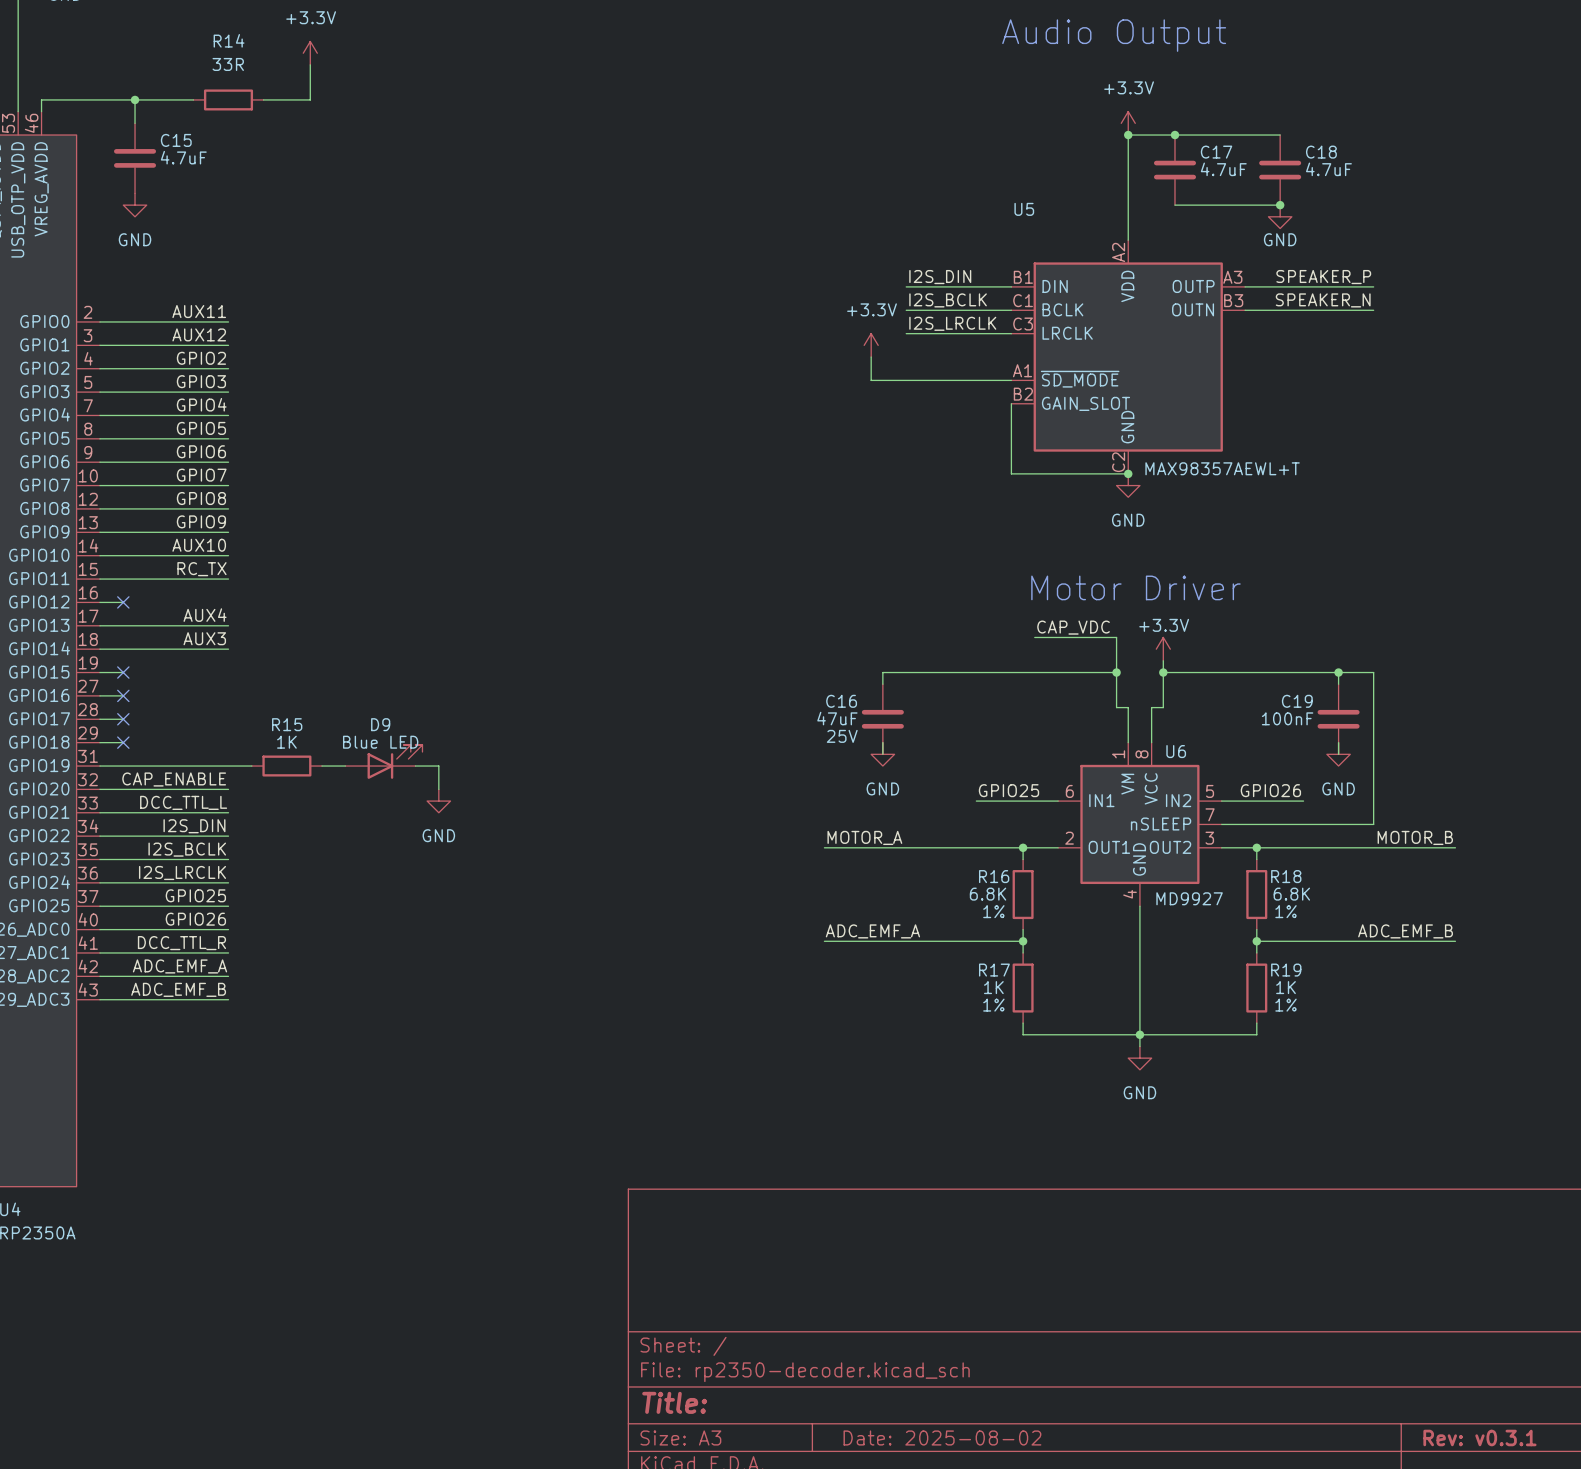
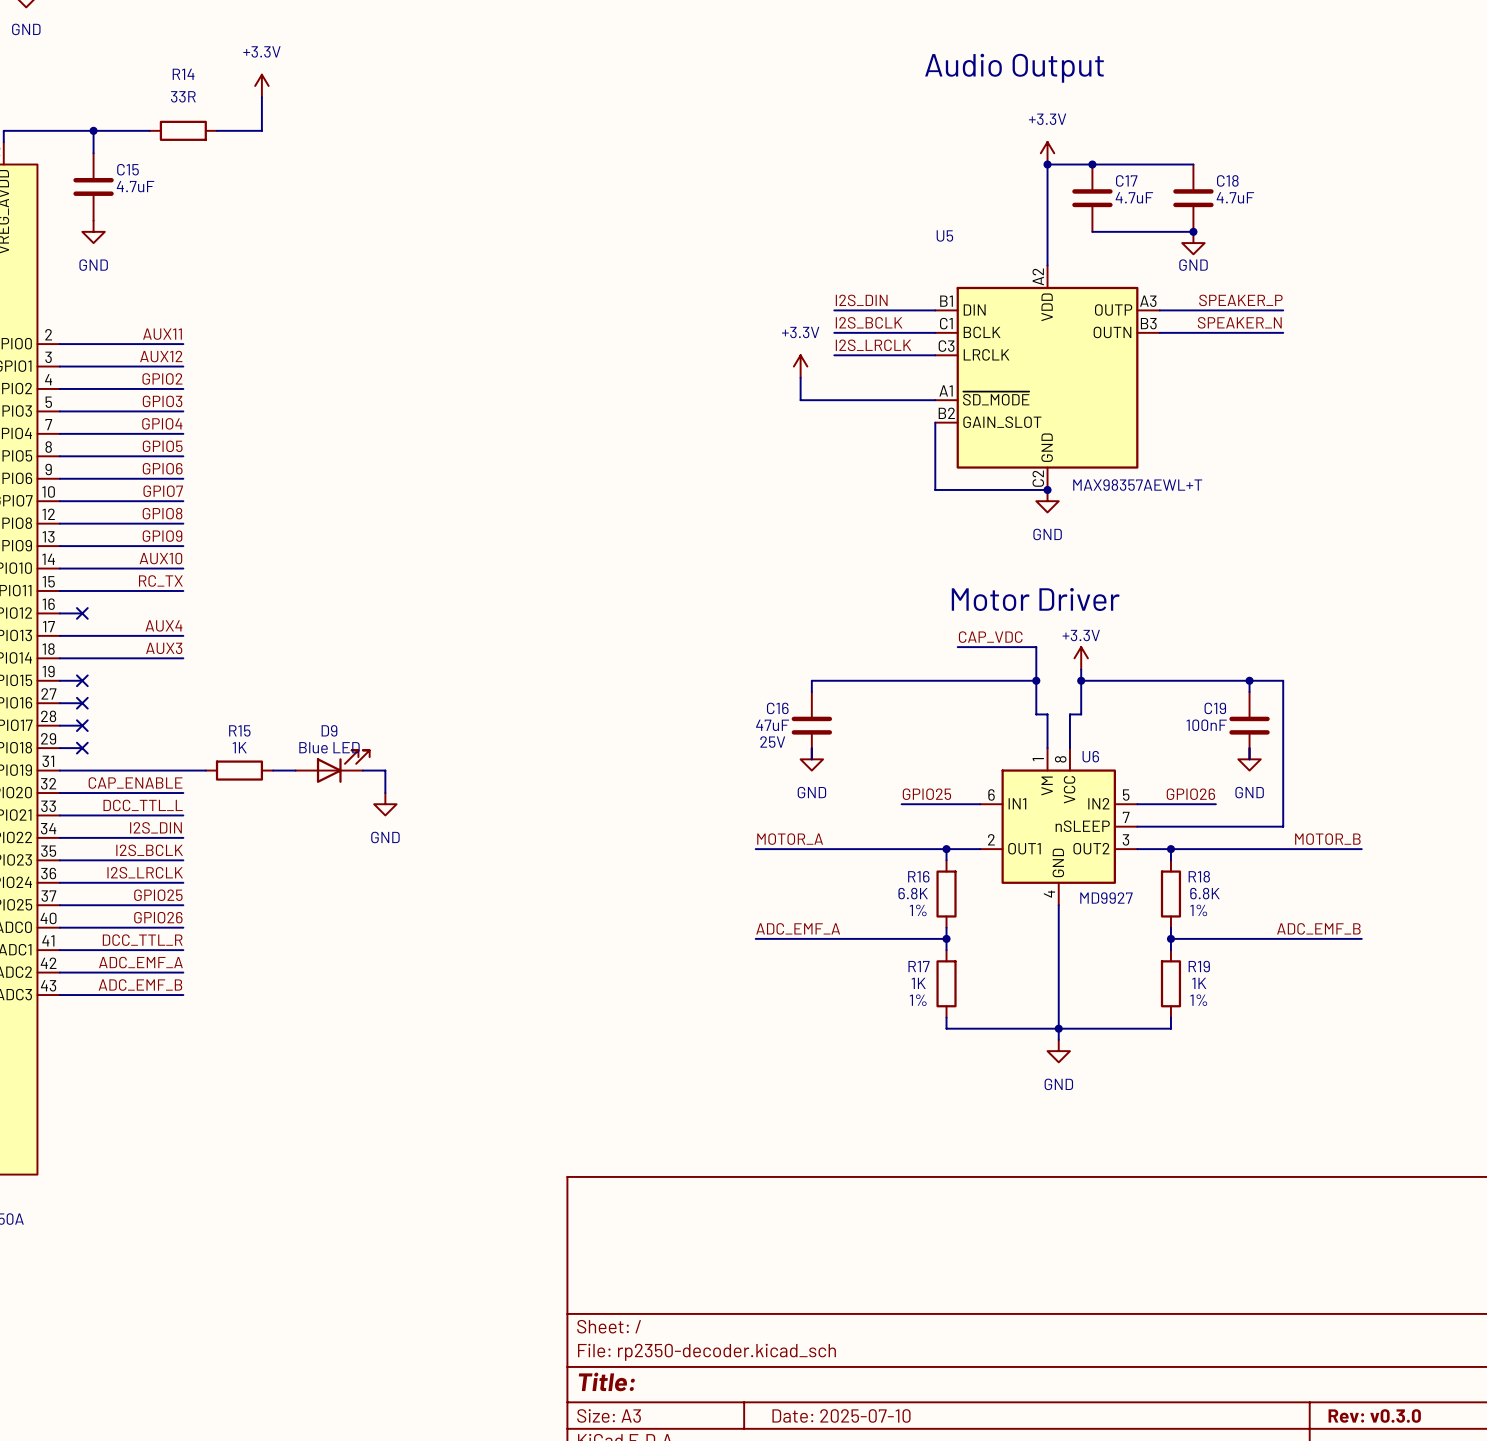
title block: Date: 2025-08-02 (942, 1437) -> Date: 2025-07-10 (841, 1415)
title block: Rev: v0.3.1 (1479, 1437) -> Rev: v0.3.0 (1374, 1415)

